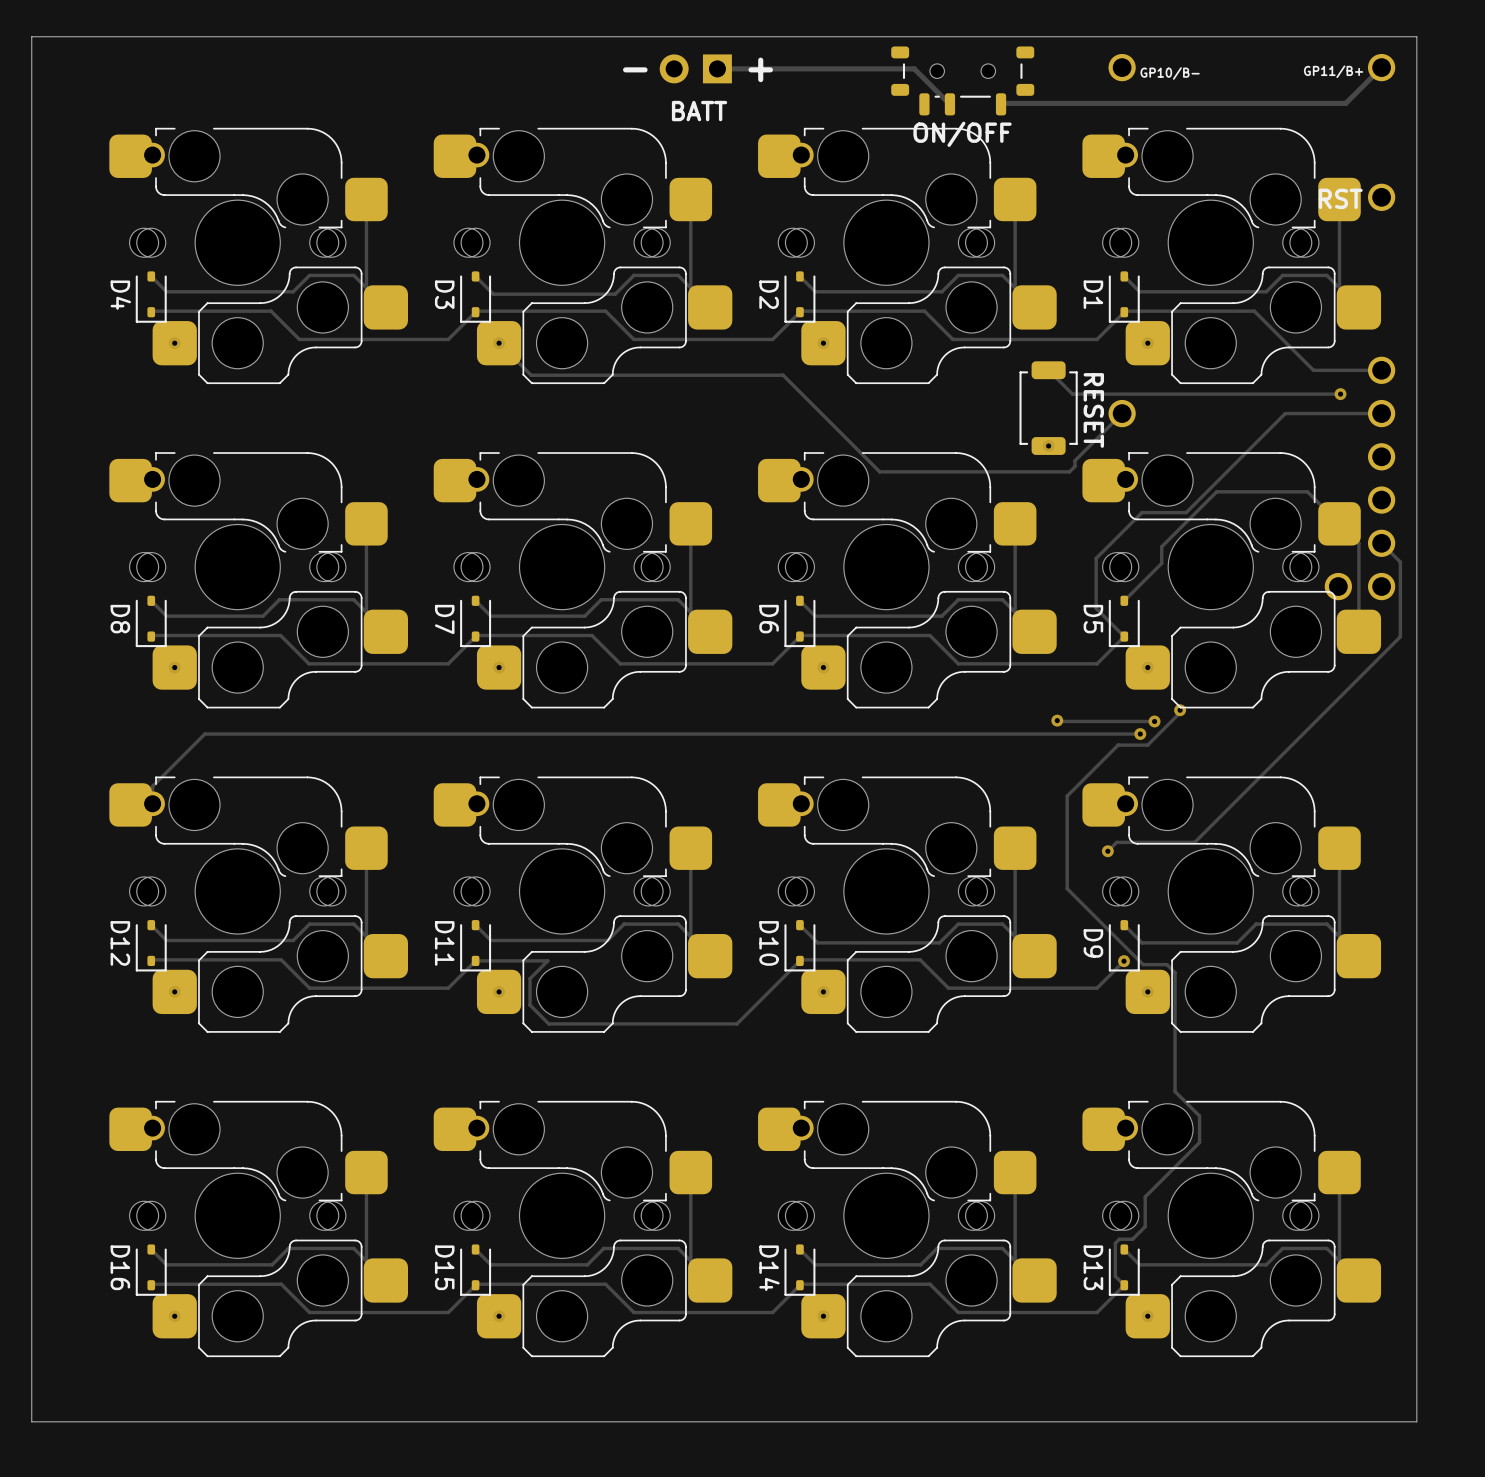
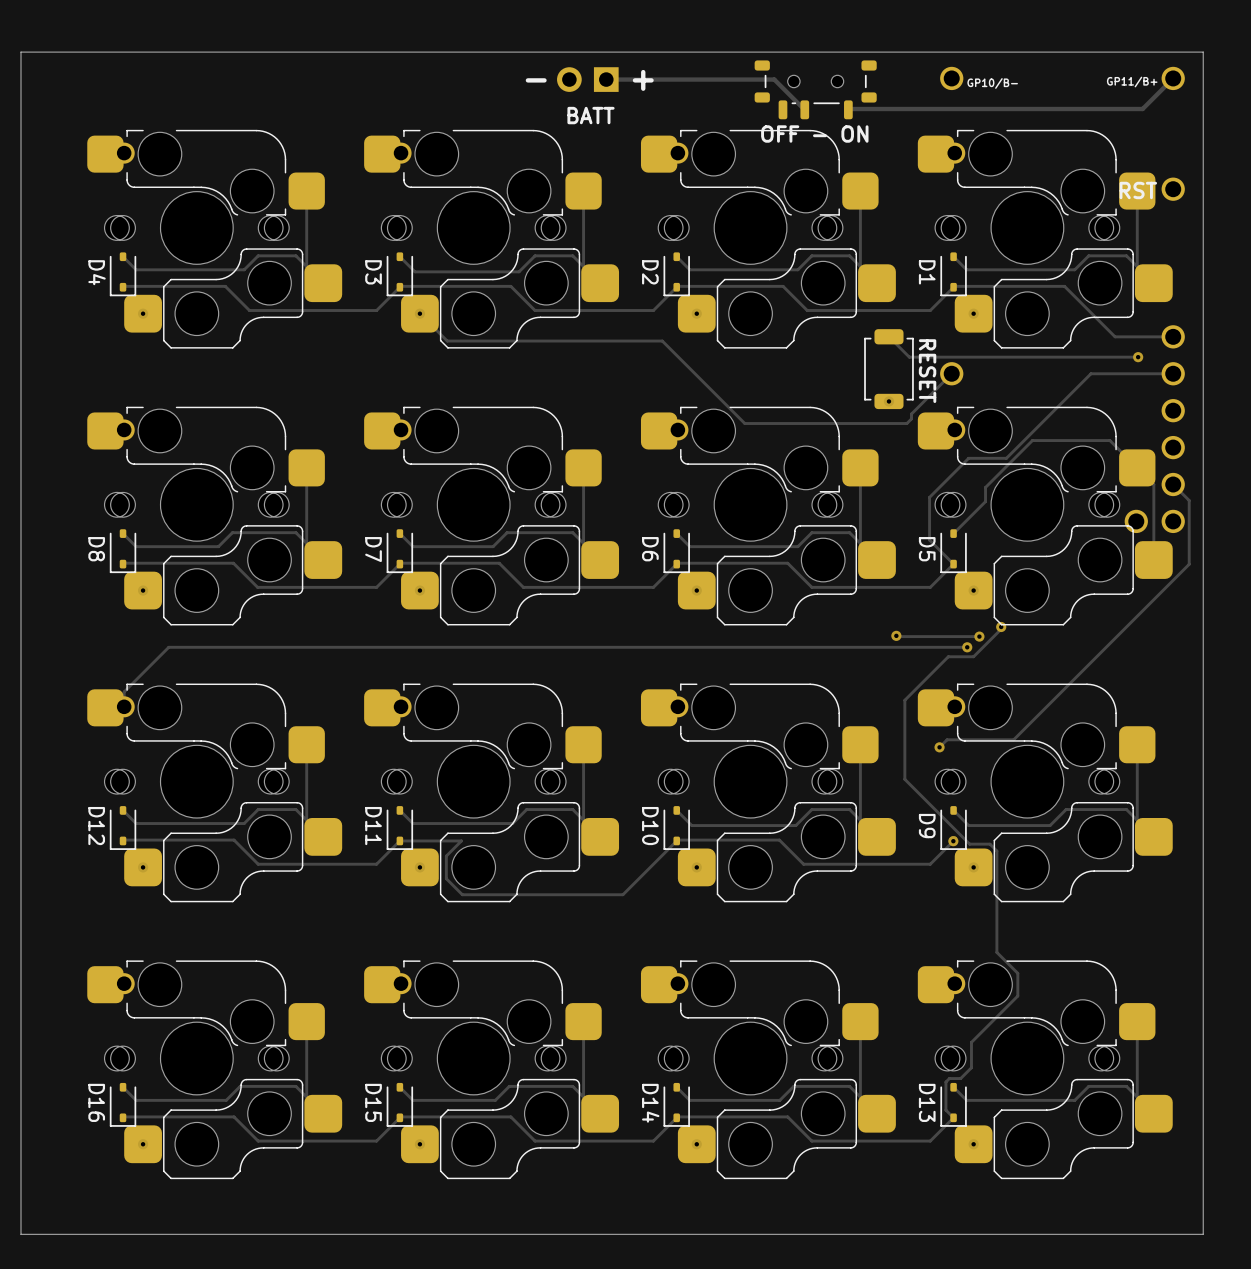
text: ON/OFF (962, 134) -> OFF - ON (814, 134)

